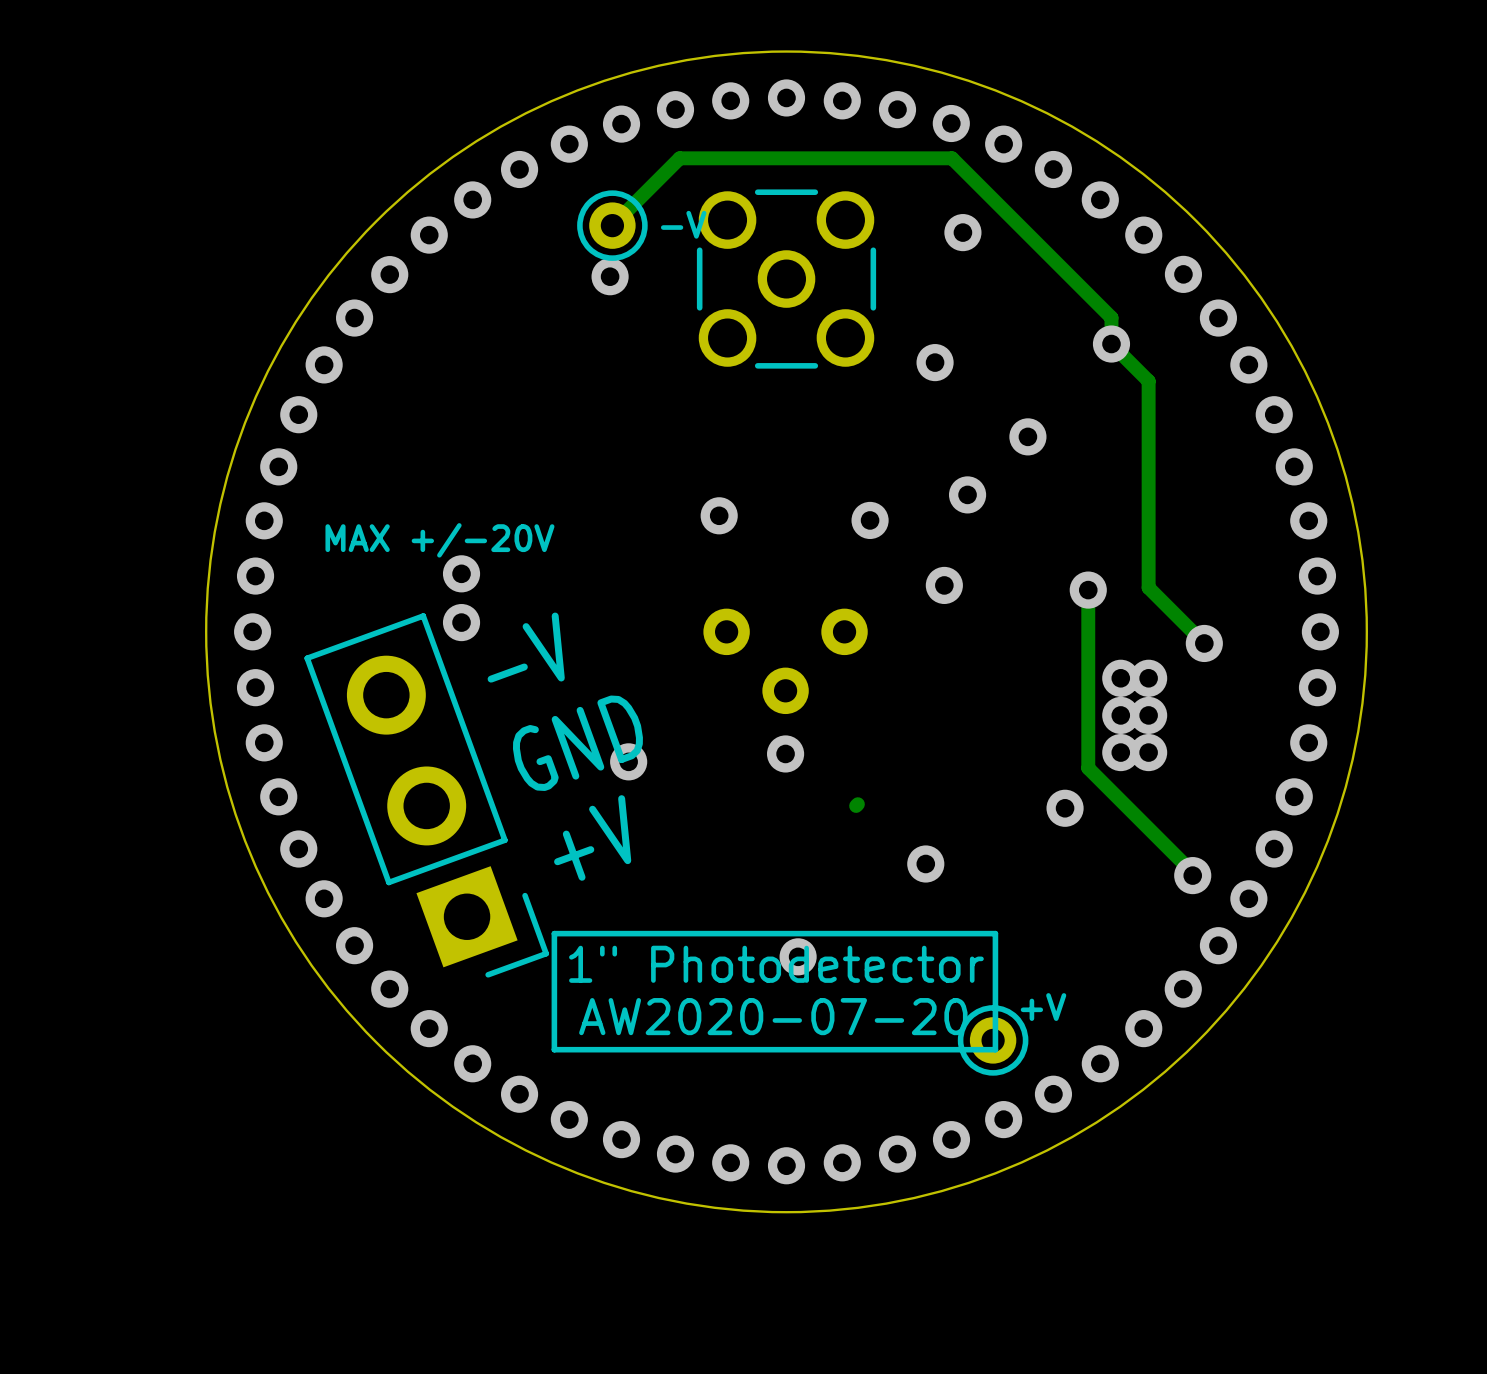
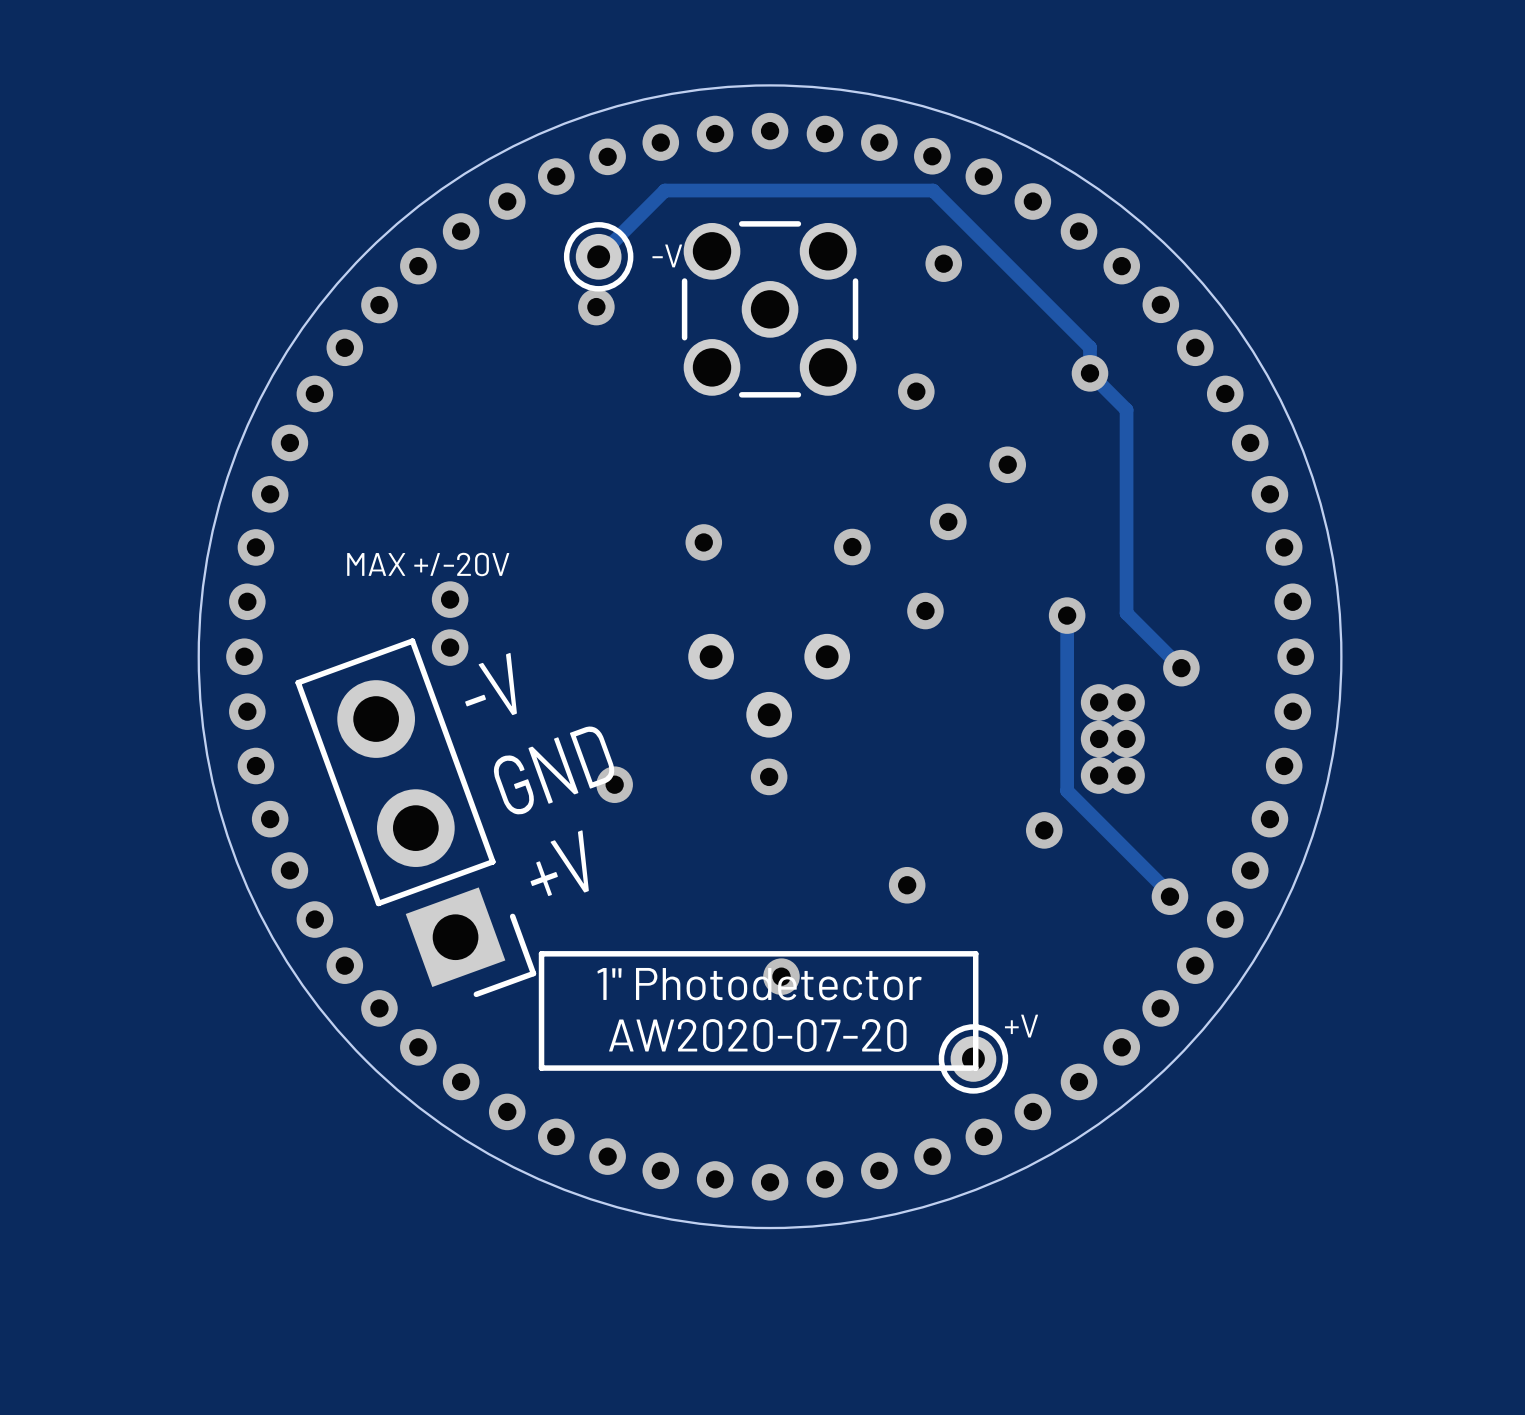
track: (857, 804) (856, 805) -> none

